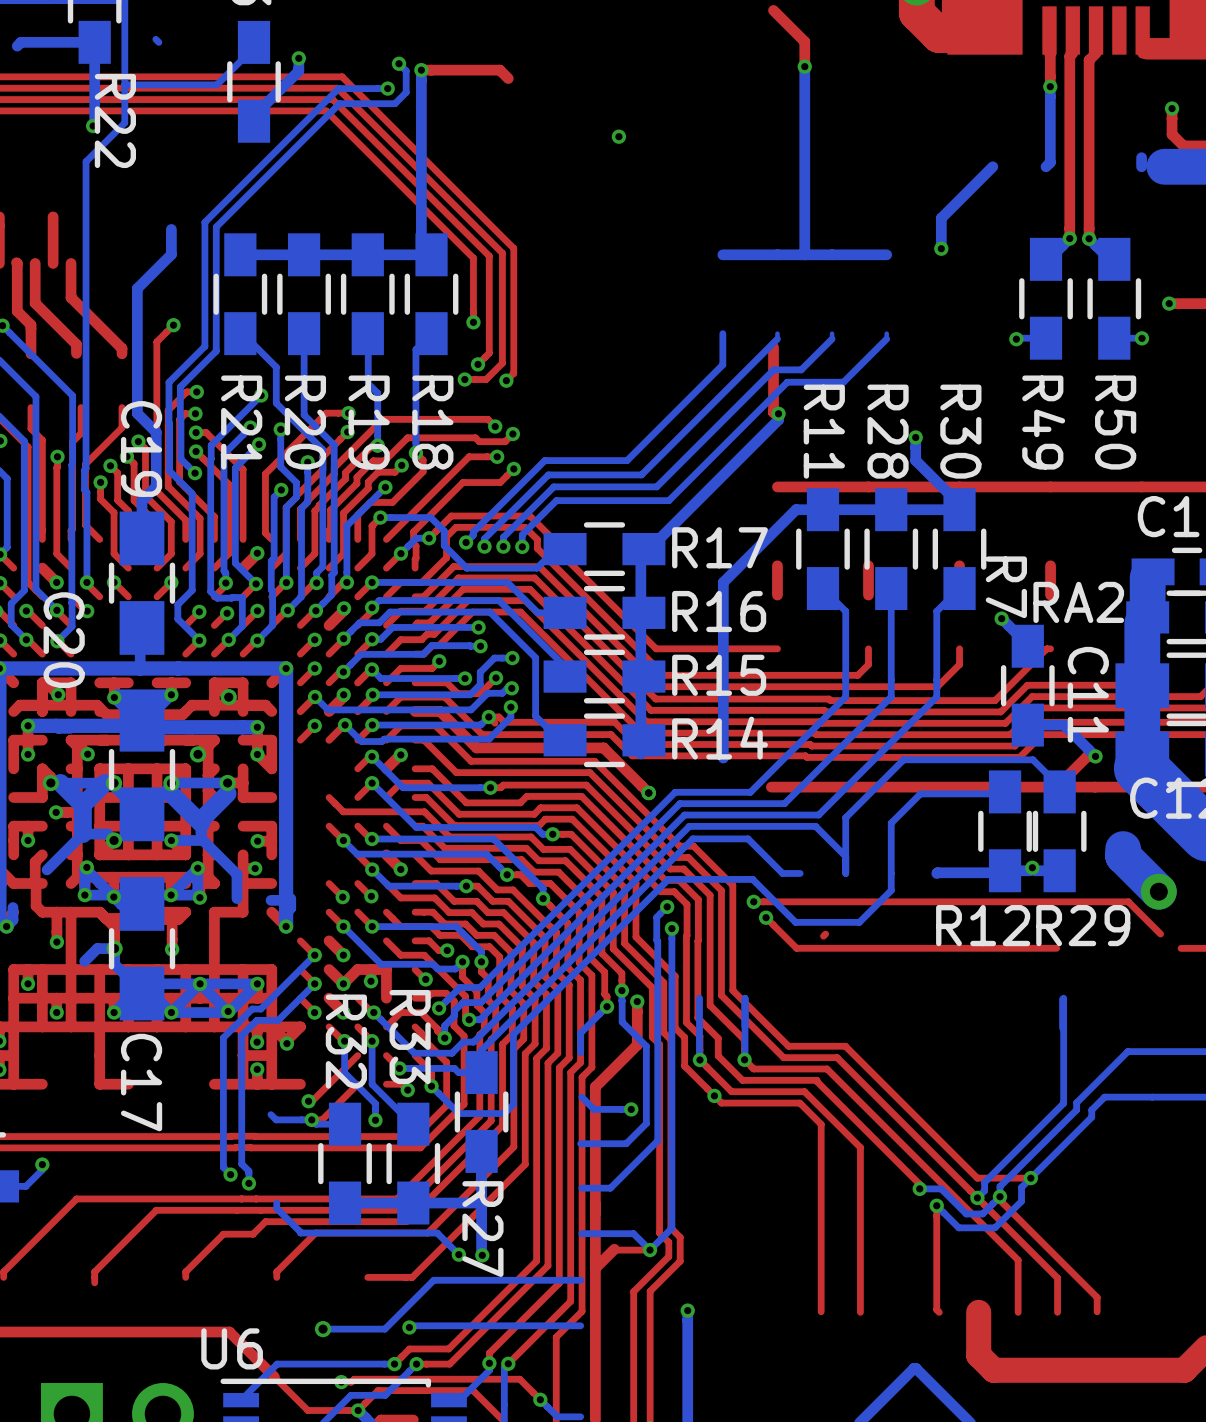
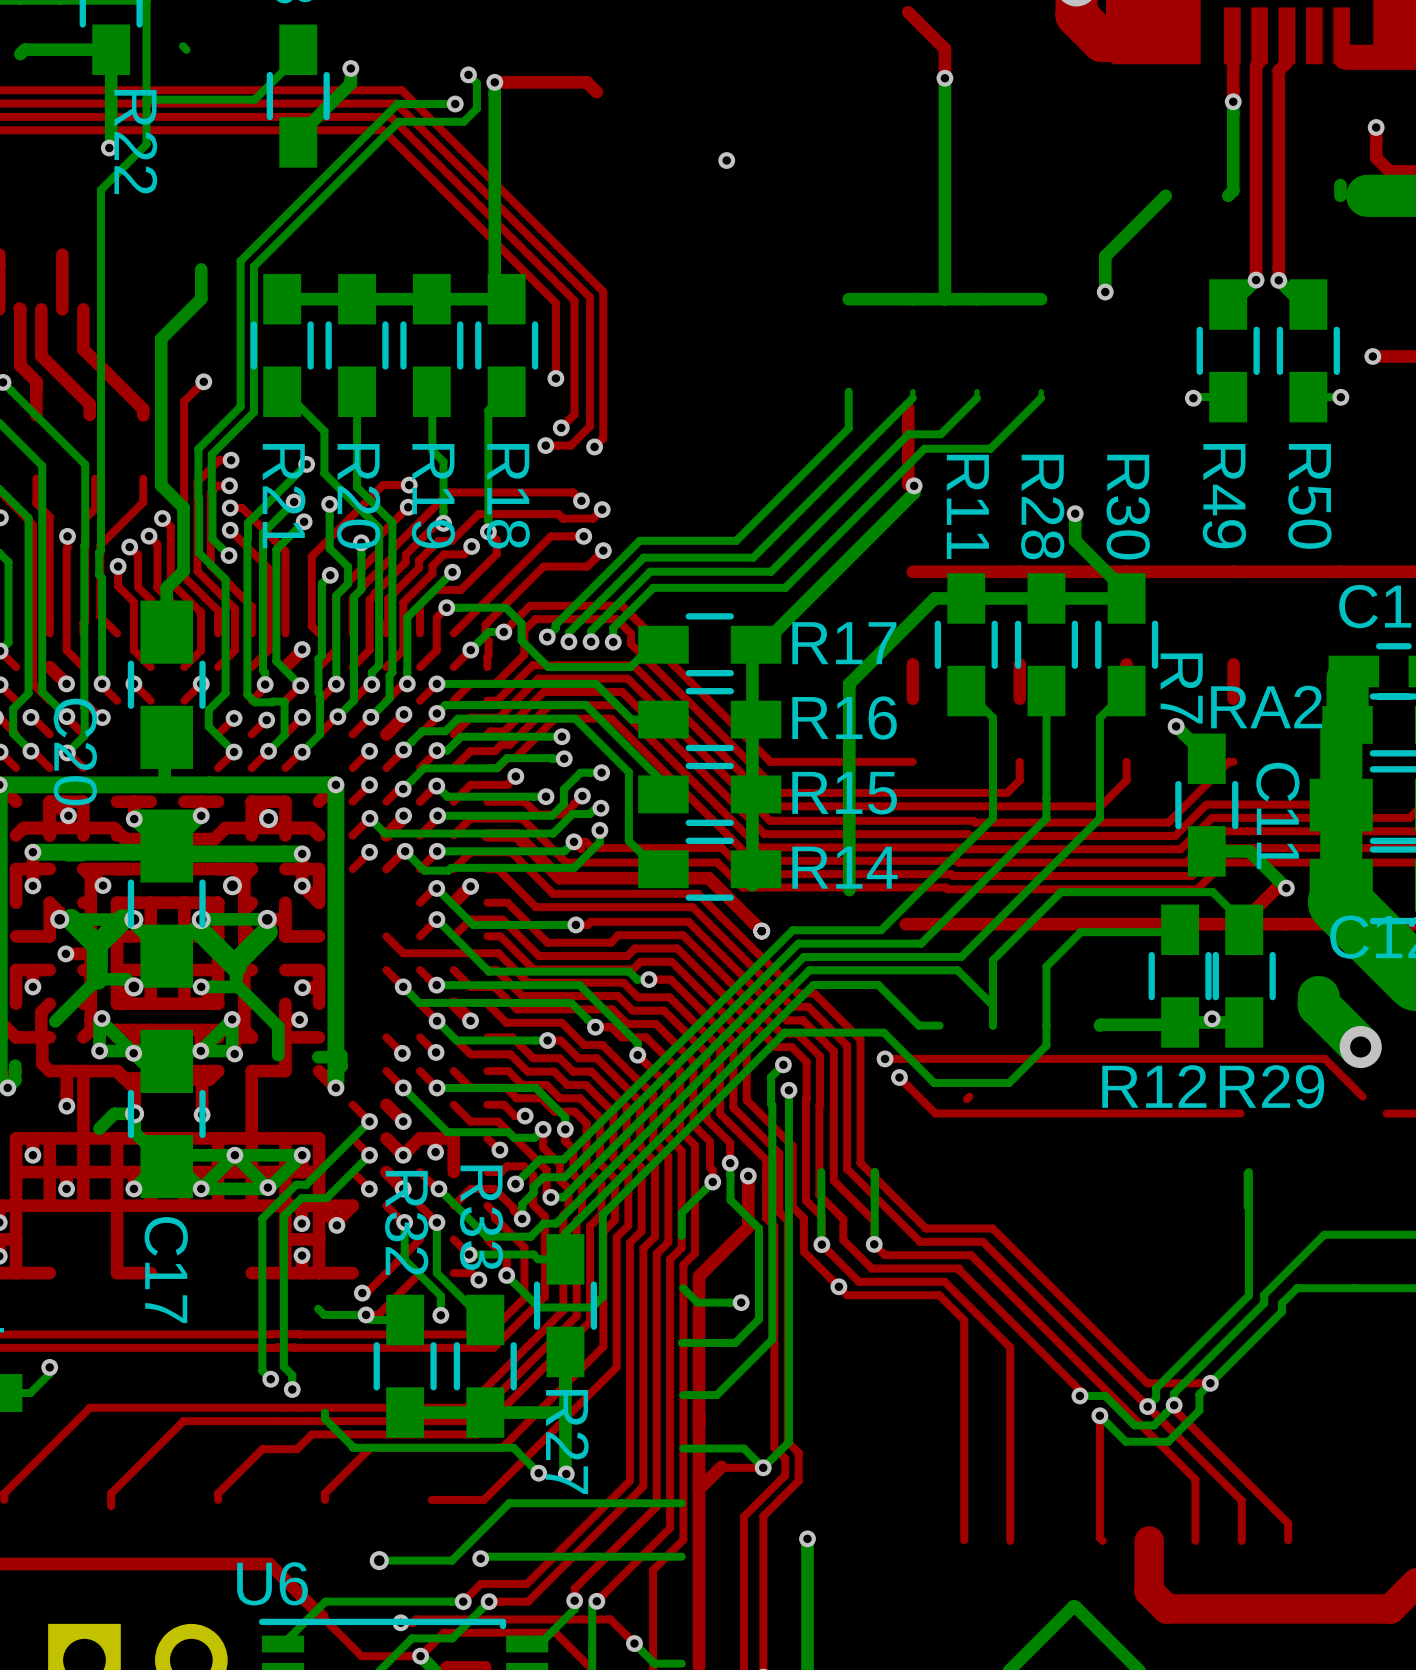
C19 name: C19 (141, 448) -> none

